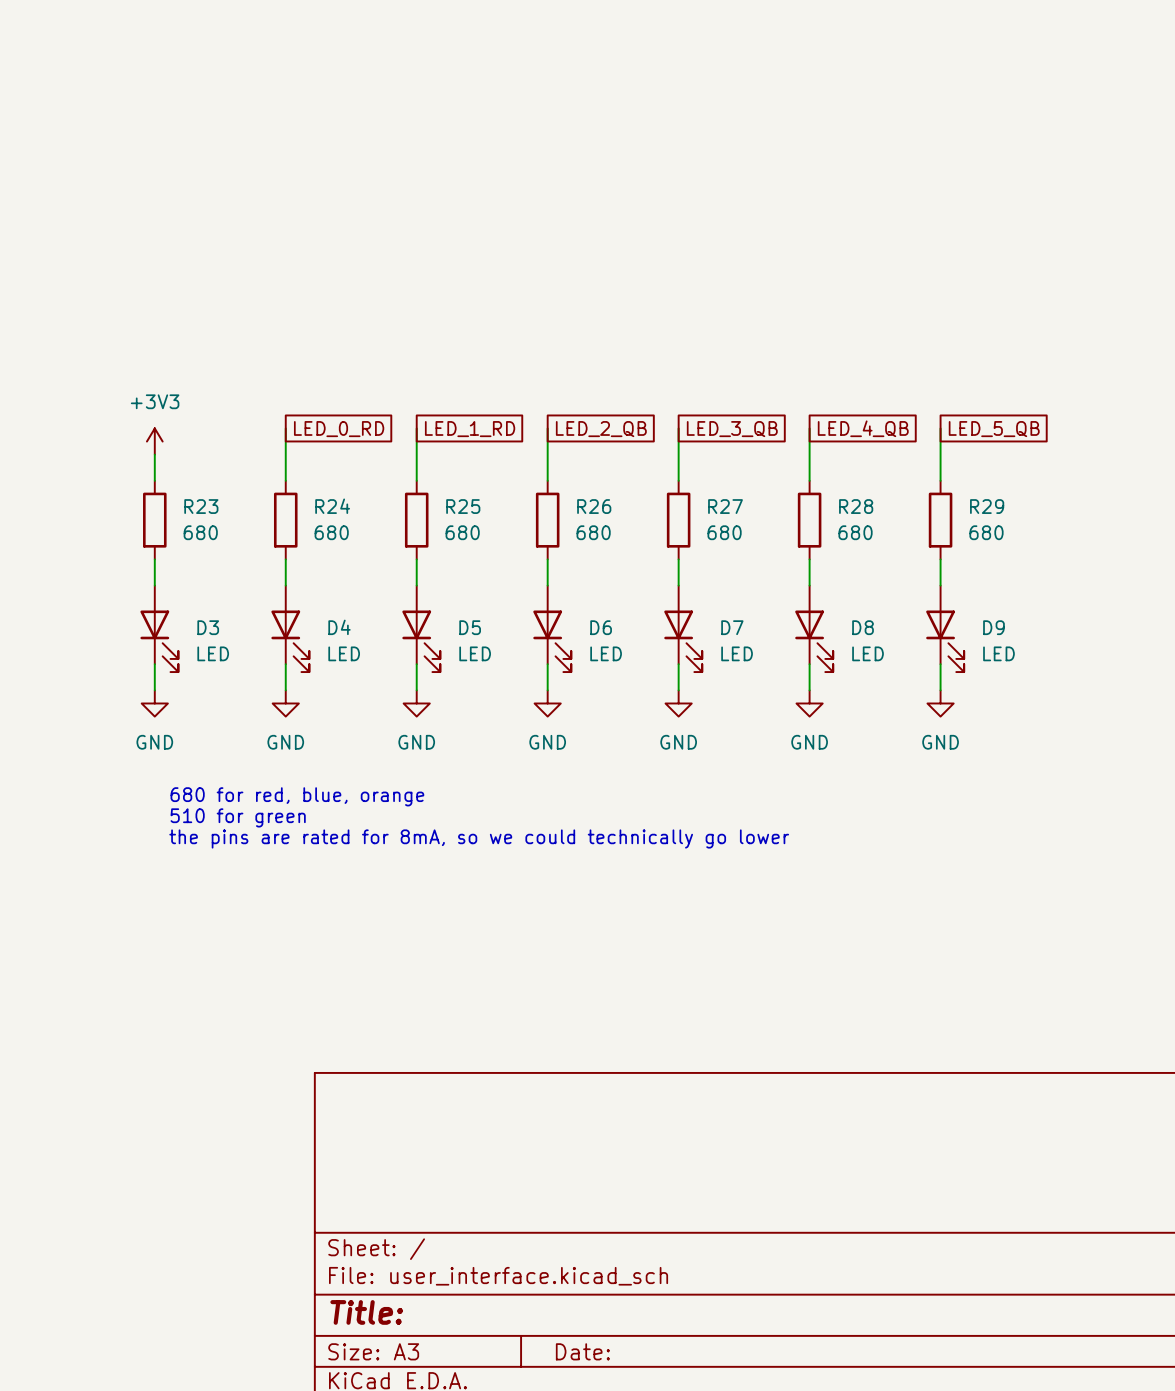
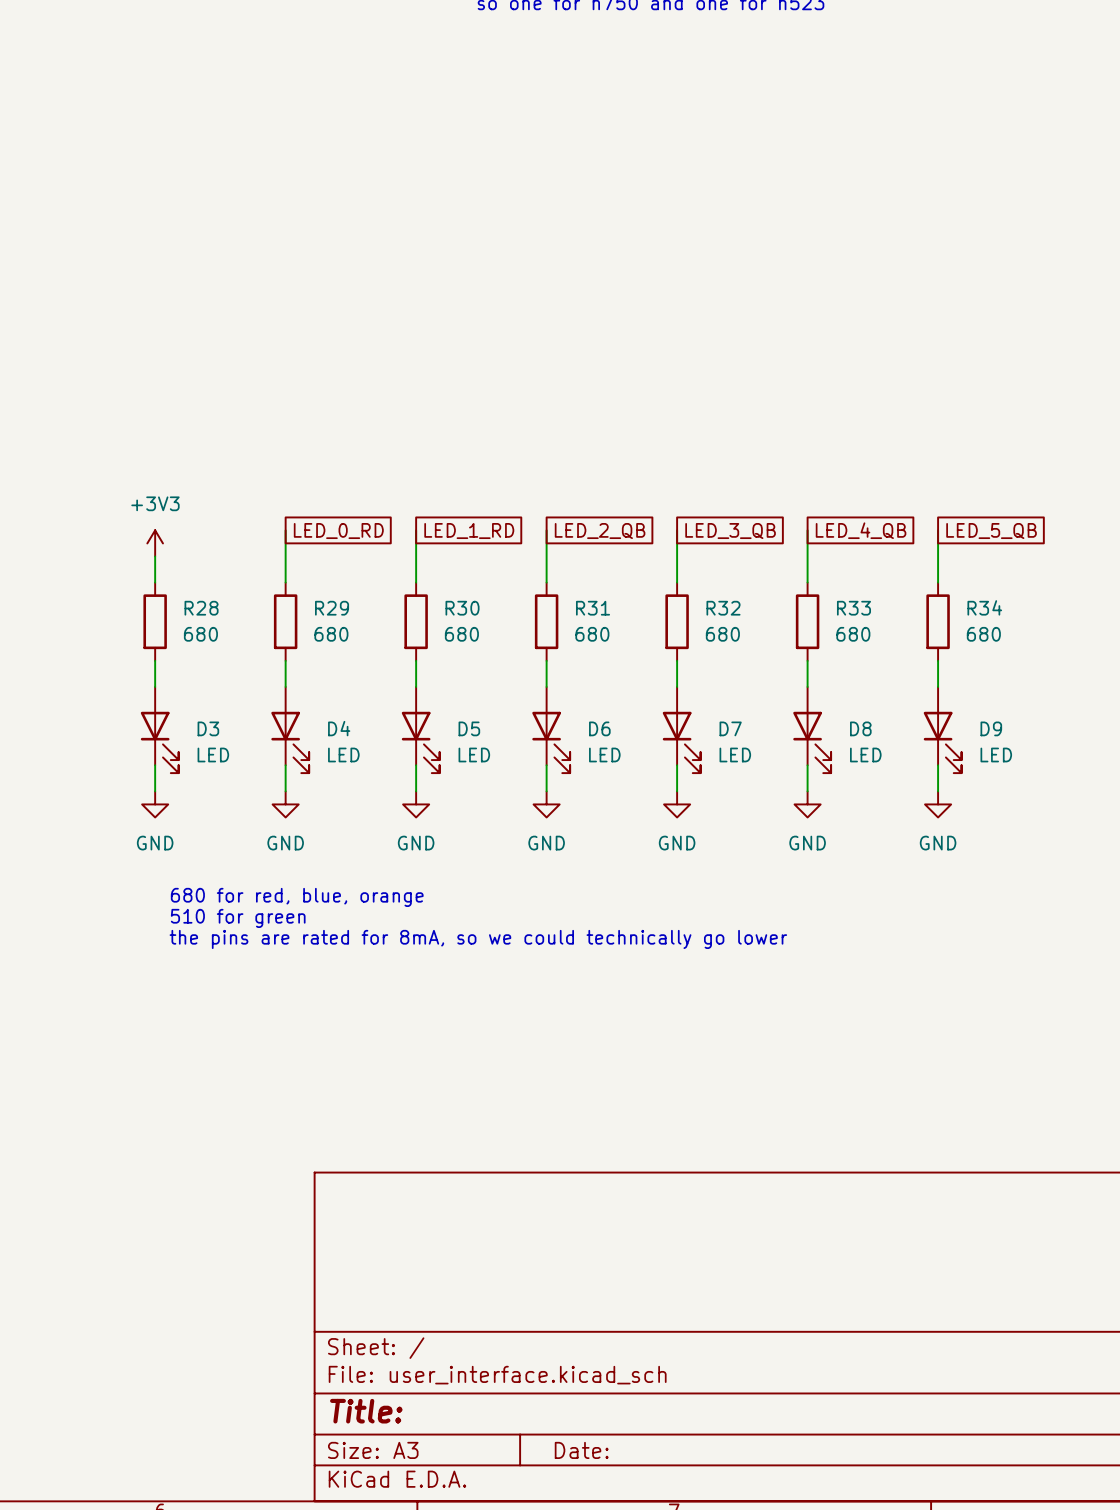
R23 name: R23 (201, 506) -> R28 (201, 608)
R24 name: R24 (332, 506) -> R29 (332, 608)
R25 name: R25 (463, 506) -> R30 (462, 608)
R26 name: R26 (594, 506) -> R31 (593, 608)
R27 name: R27 (725, 506) -> R32 (723, 608)
R28 name: R28 (856, 506) -> R33 (853, 608)
R29 name: R29 (987, 506) -> R34 (984, 607)

